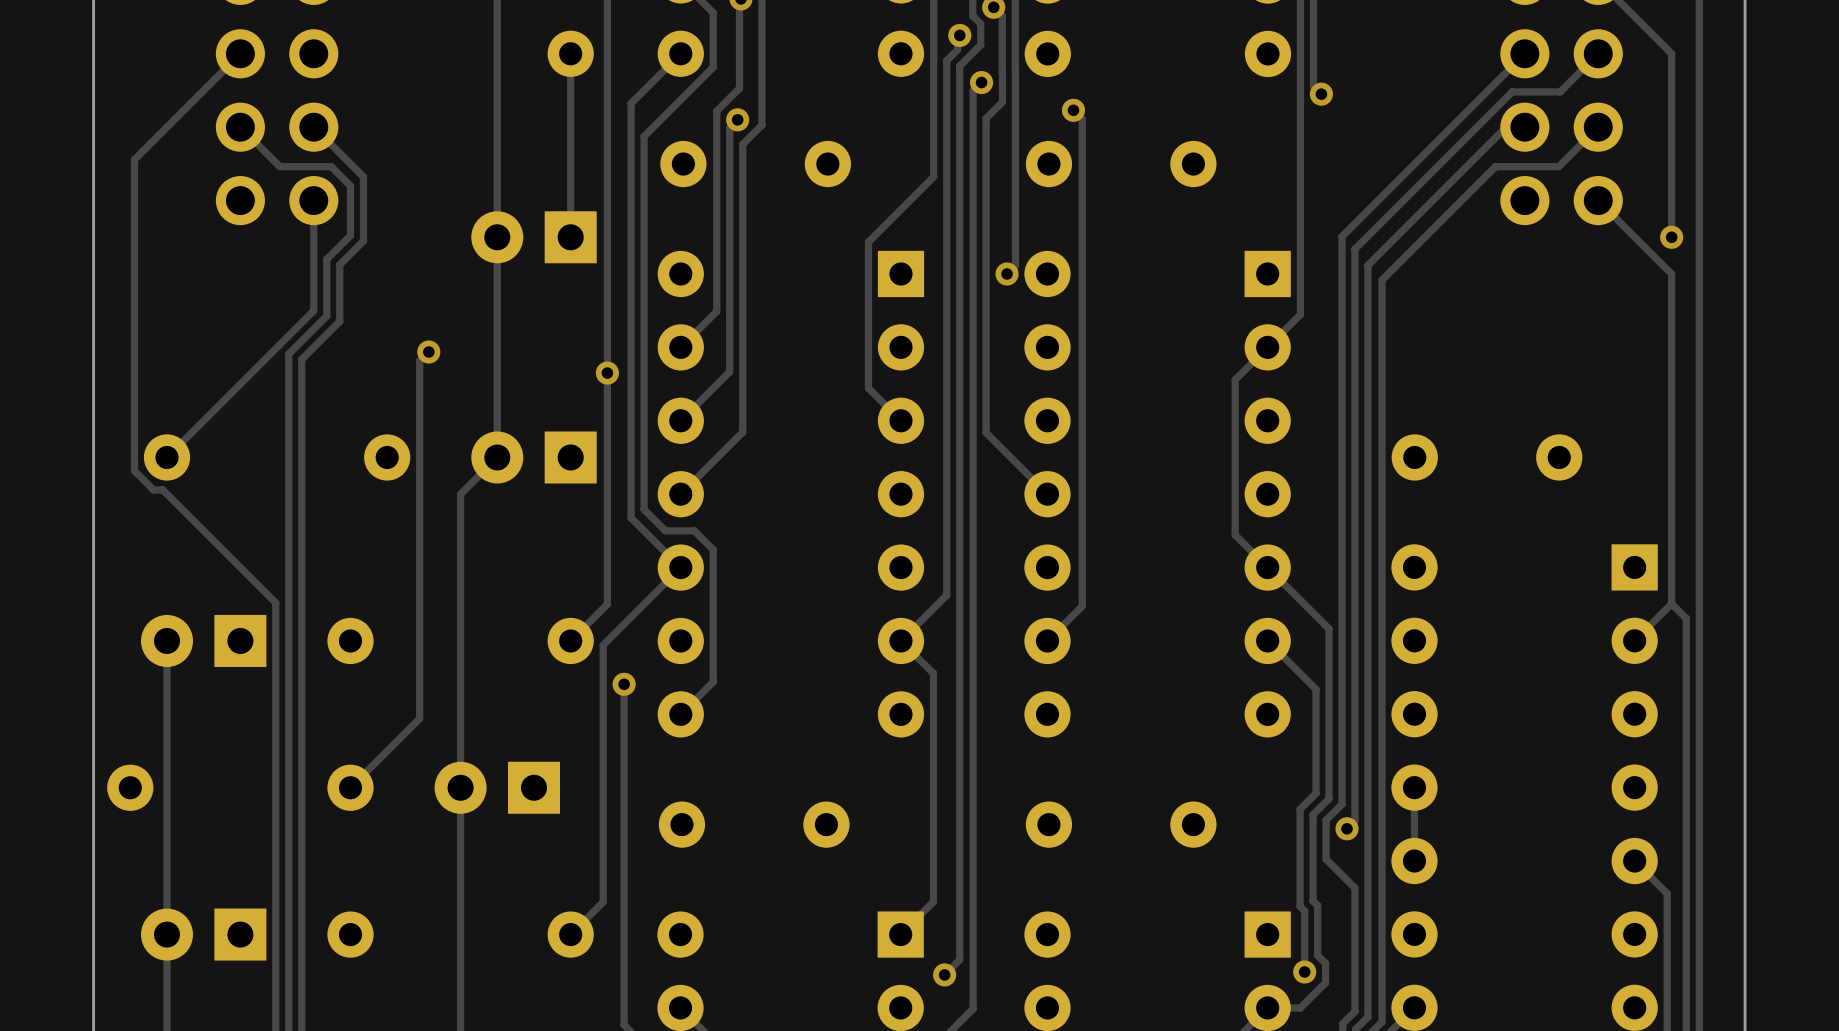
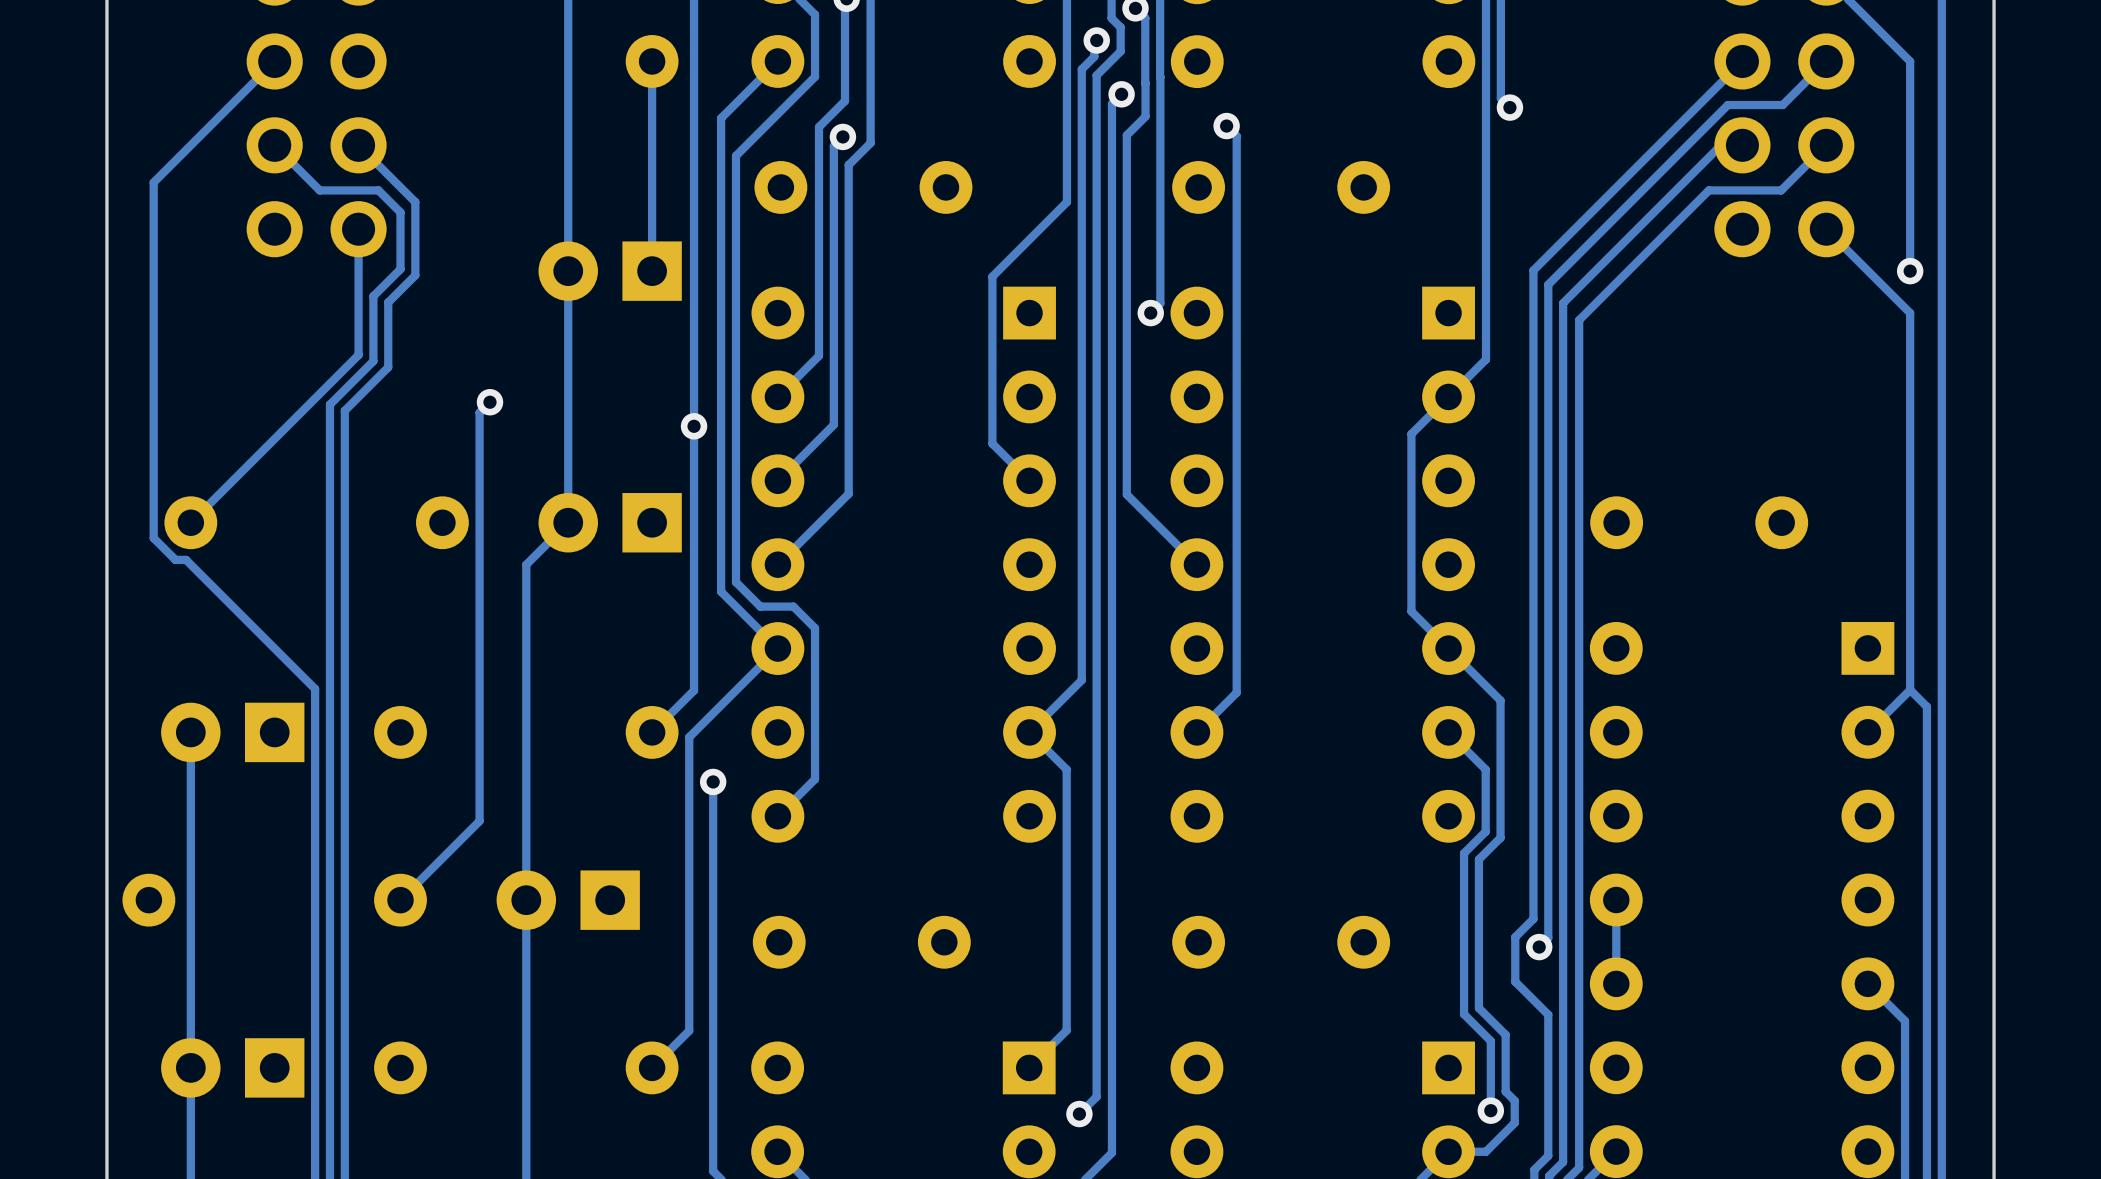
track: (1313, 613) (1328, 628) (1328, 798) (1313, 814) (1313, 901) -> (1500, 700) (1500, 837) (1478, 859) (1478, 1008) (1500, 1029)
track: (1300, 673) (1315, 689) (1315, 793) (1300, 809) (1300, 906) -> (1485, 769) (1485, 831) (1464, 853) (1464, 1014) (1485, 1035)

